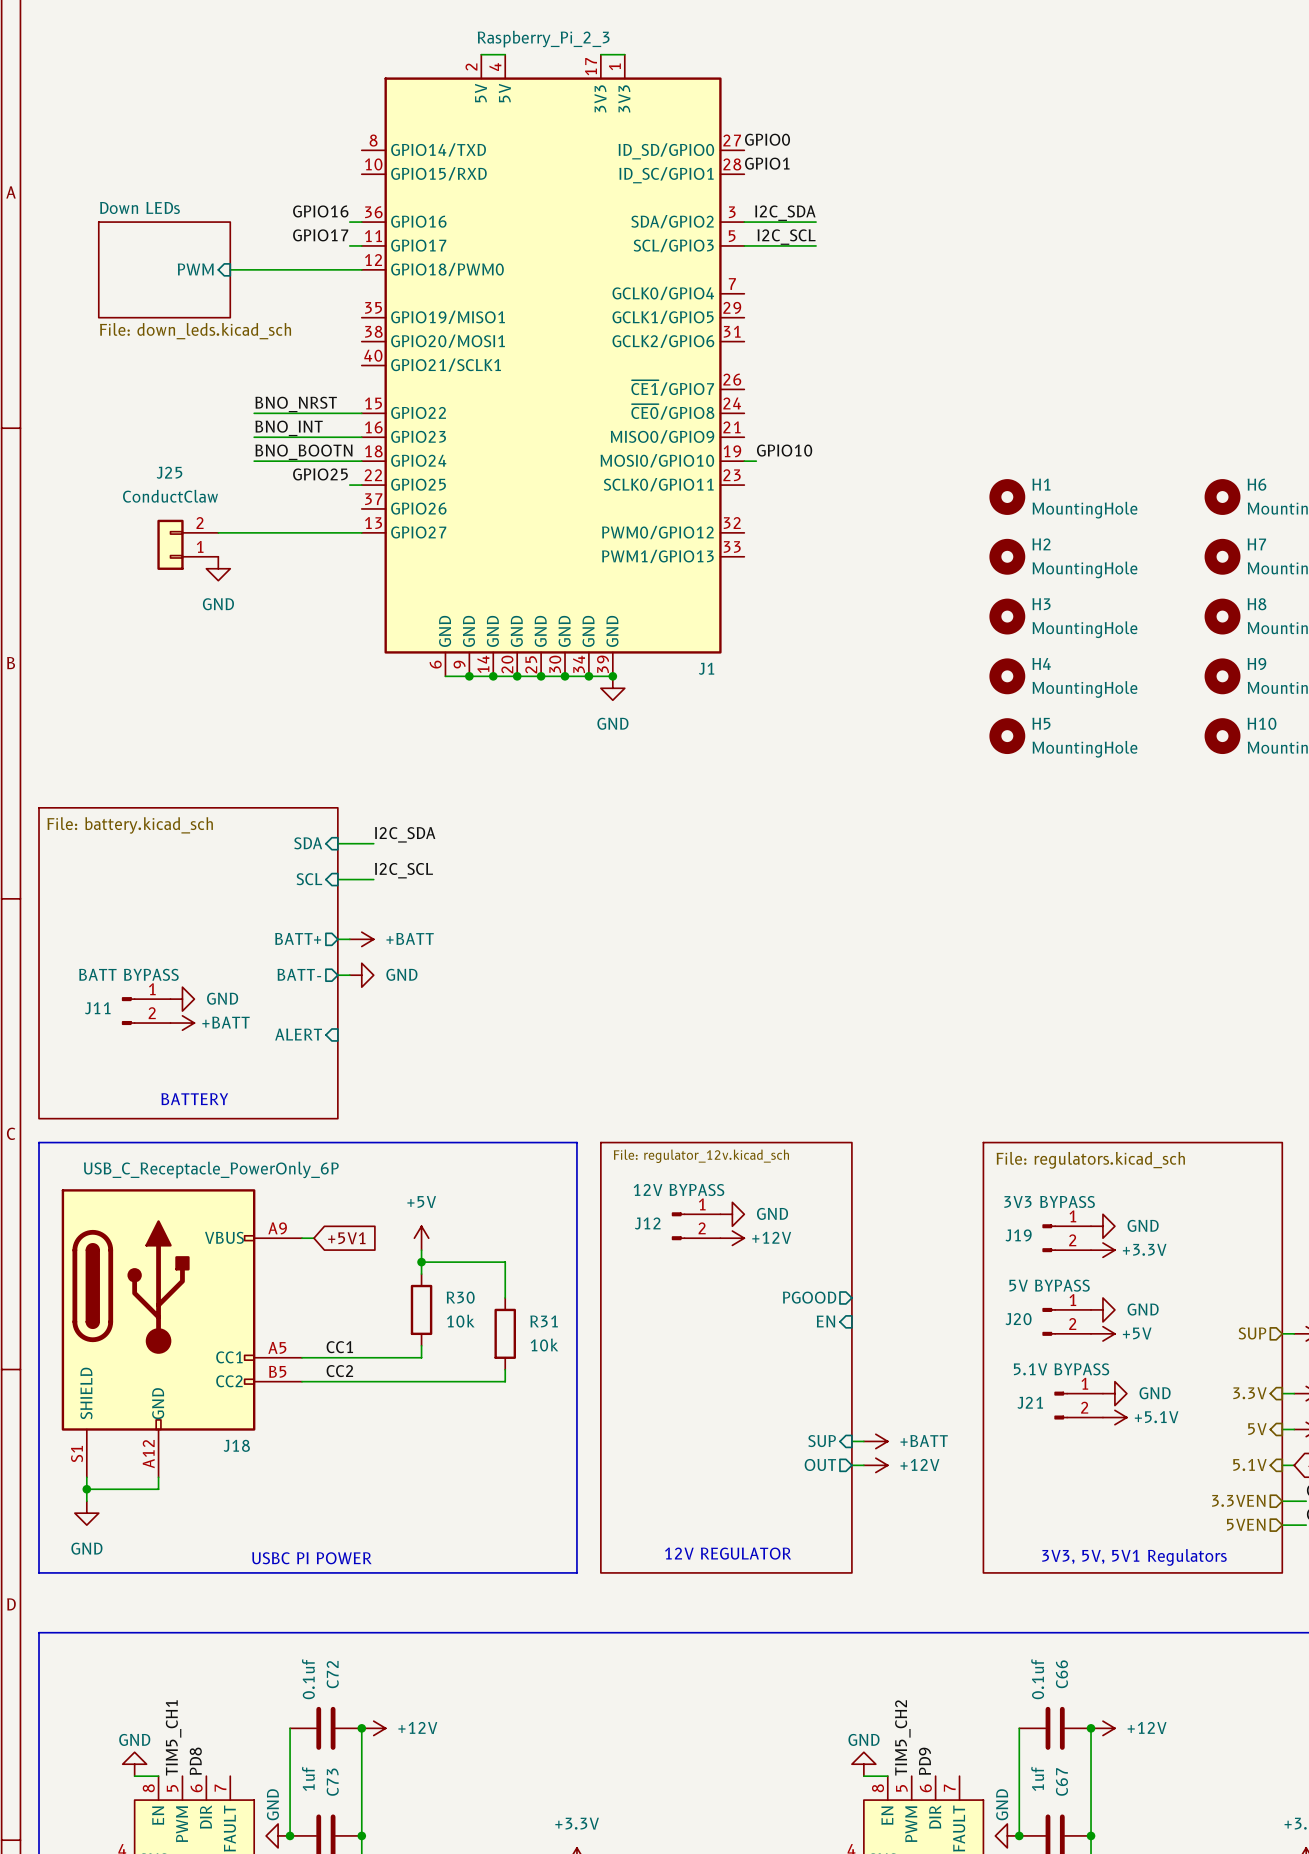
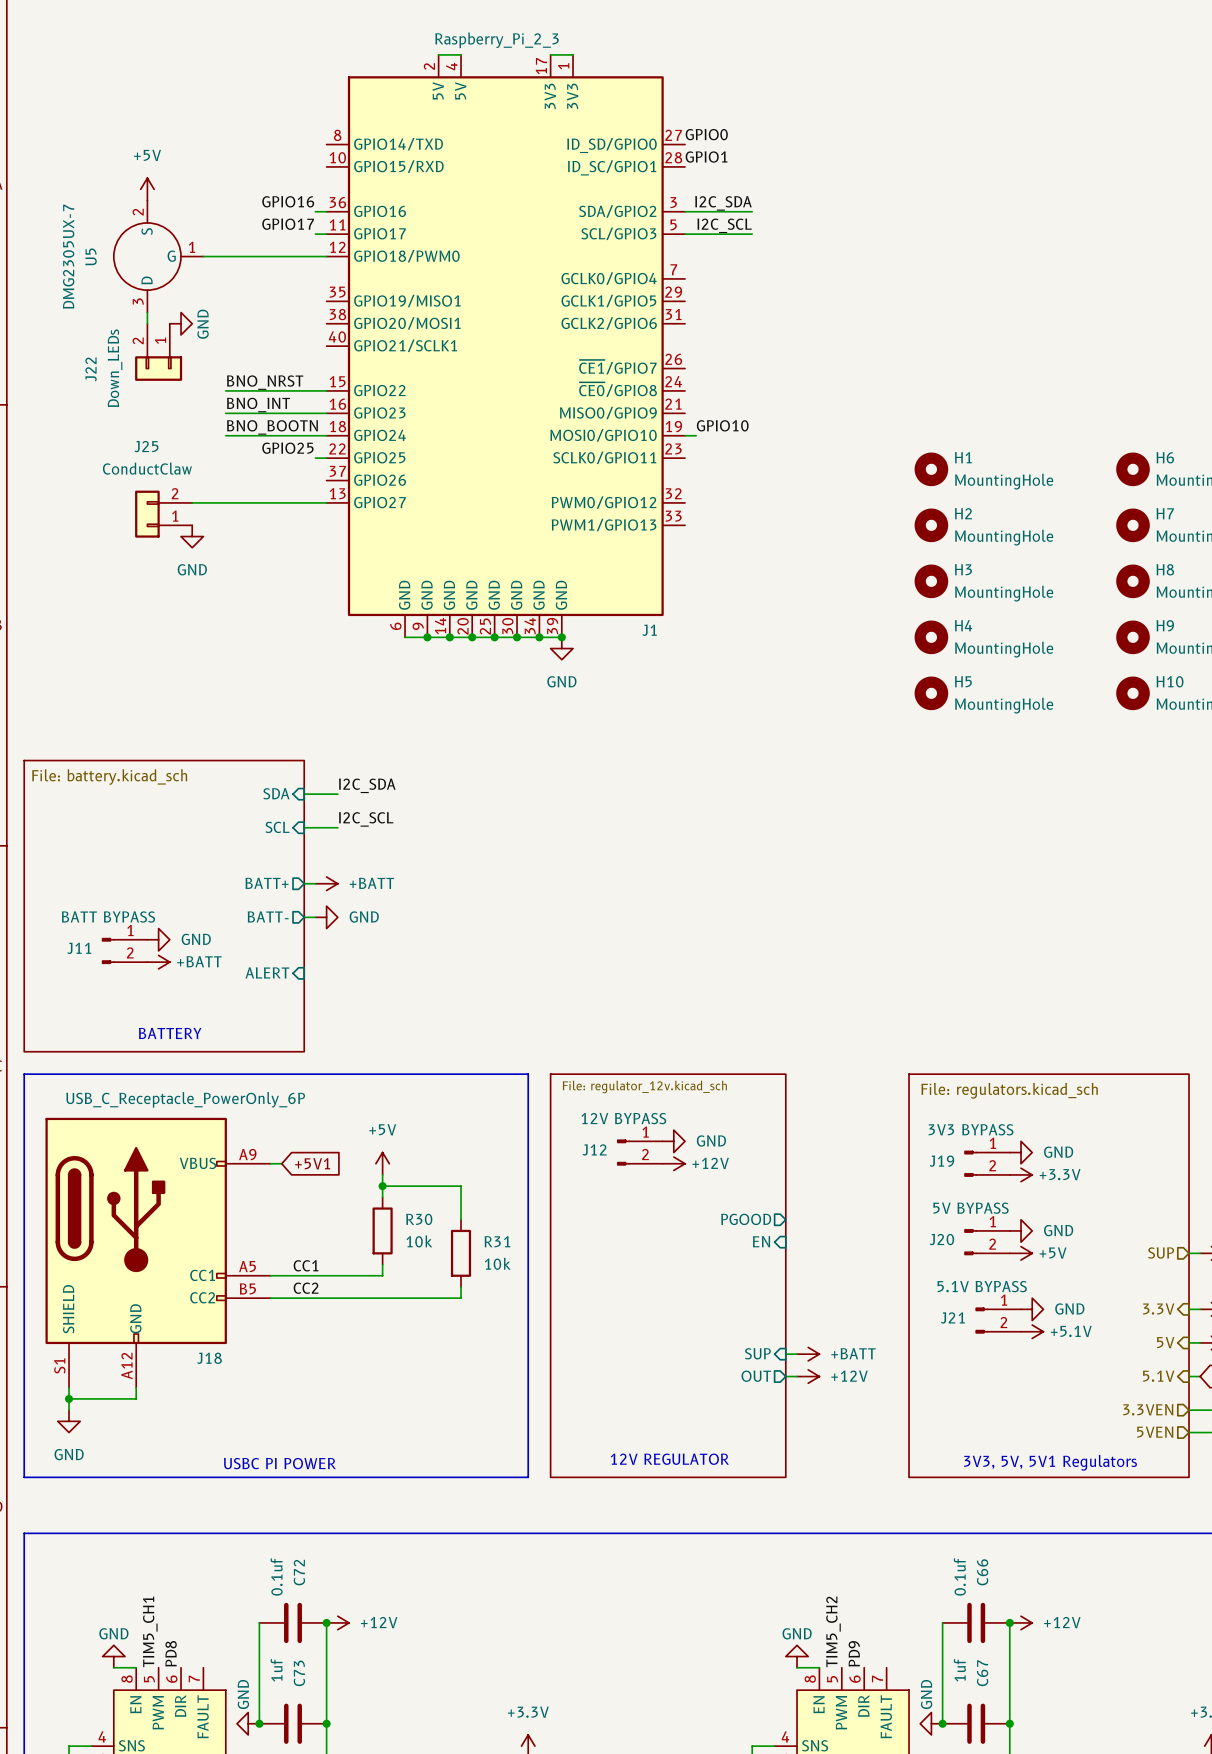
power symbol: none -> +5V (147, 189)
sheet Down LEDs: File: down_leds.kicad_sch (164, 269) -> none
U5: none -> DMG2305UX-7 (158, 256)
sheet pin: PWM (195, 269) -> none
wire: none -> (147, 312) (147, 323)
power symbol: none -> GND (181, 323)
J22: none -> Down_LEDs (158, 352)

